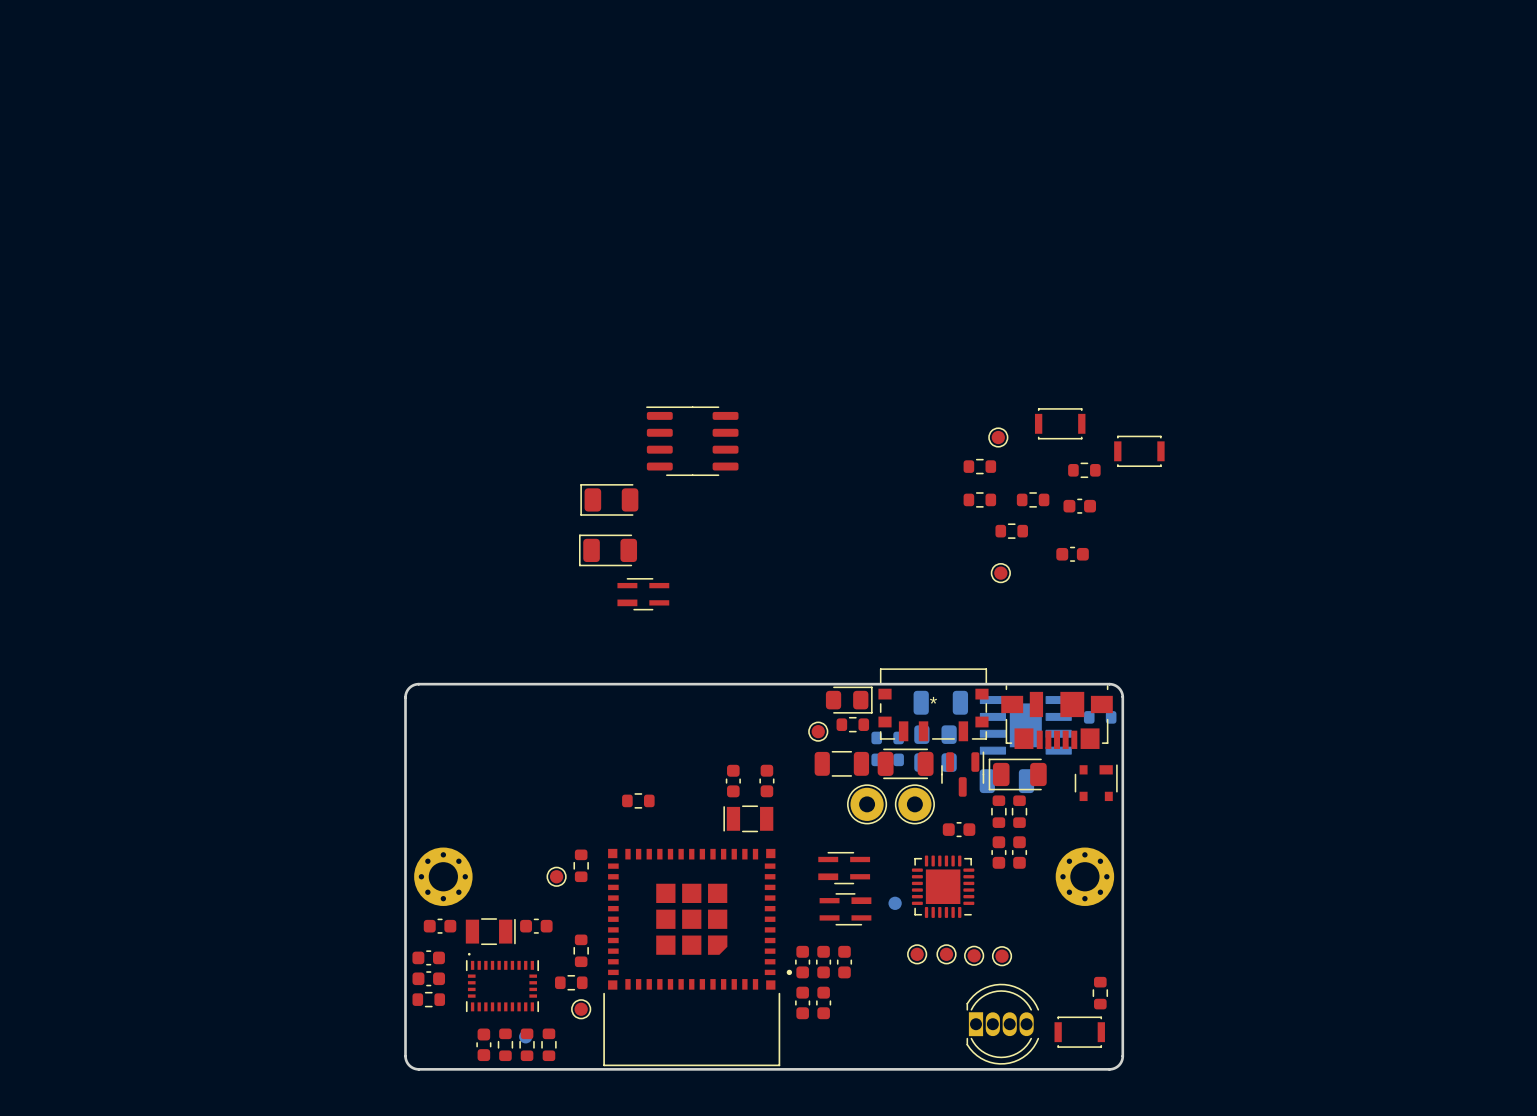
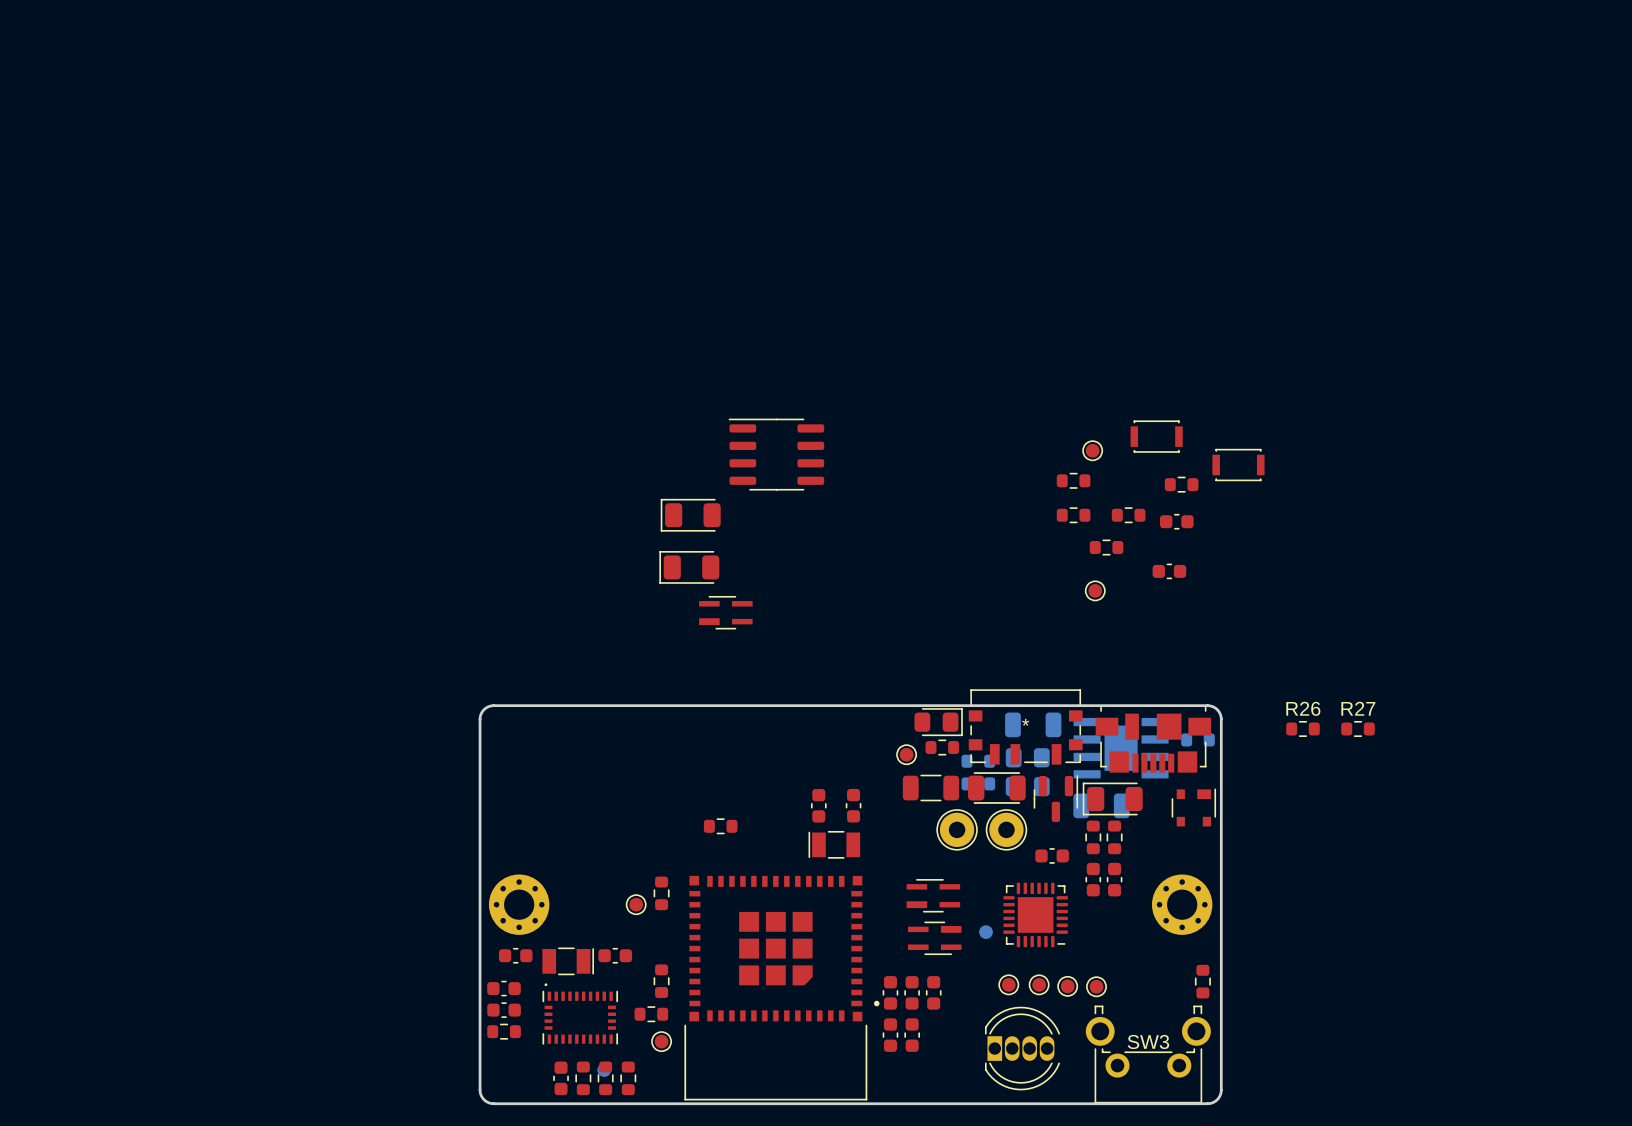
R26: none -> (1302, 728)
R27: none -> (1358, 728)
part position: (1100, 993) -> (1202, 981)
SW3: none -> (1148, 1054)
part position: (1002, 1024) -> (1022, 1048)
part: (1079, 1032) -> none

